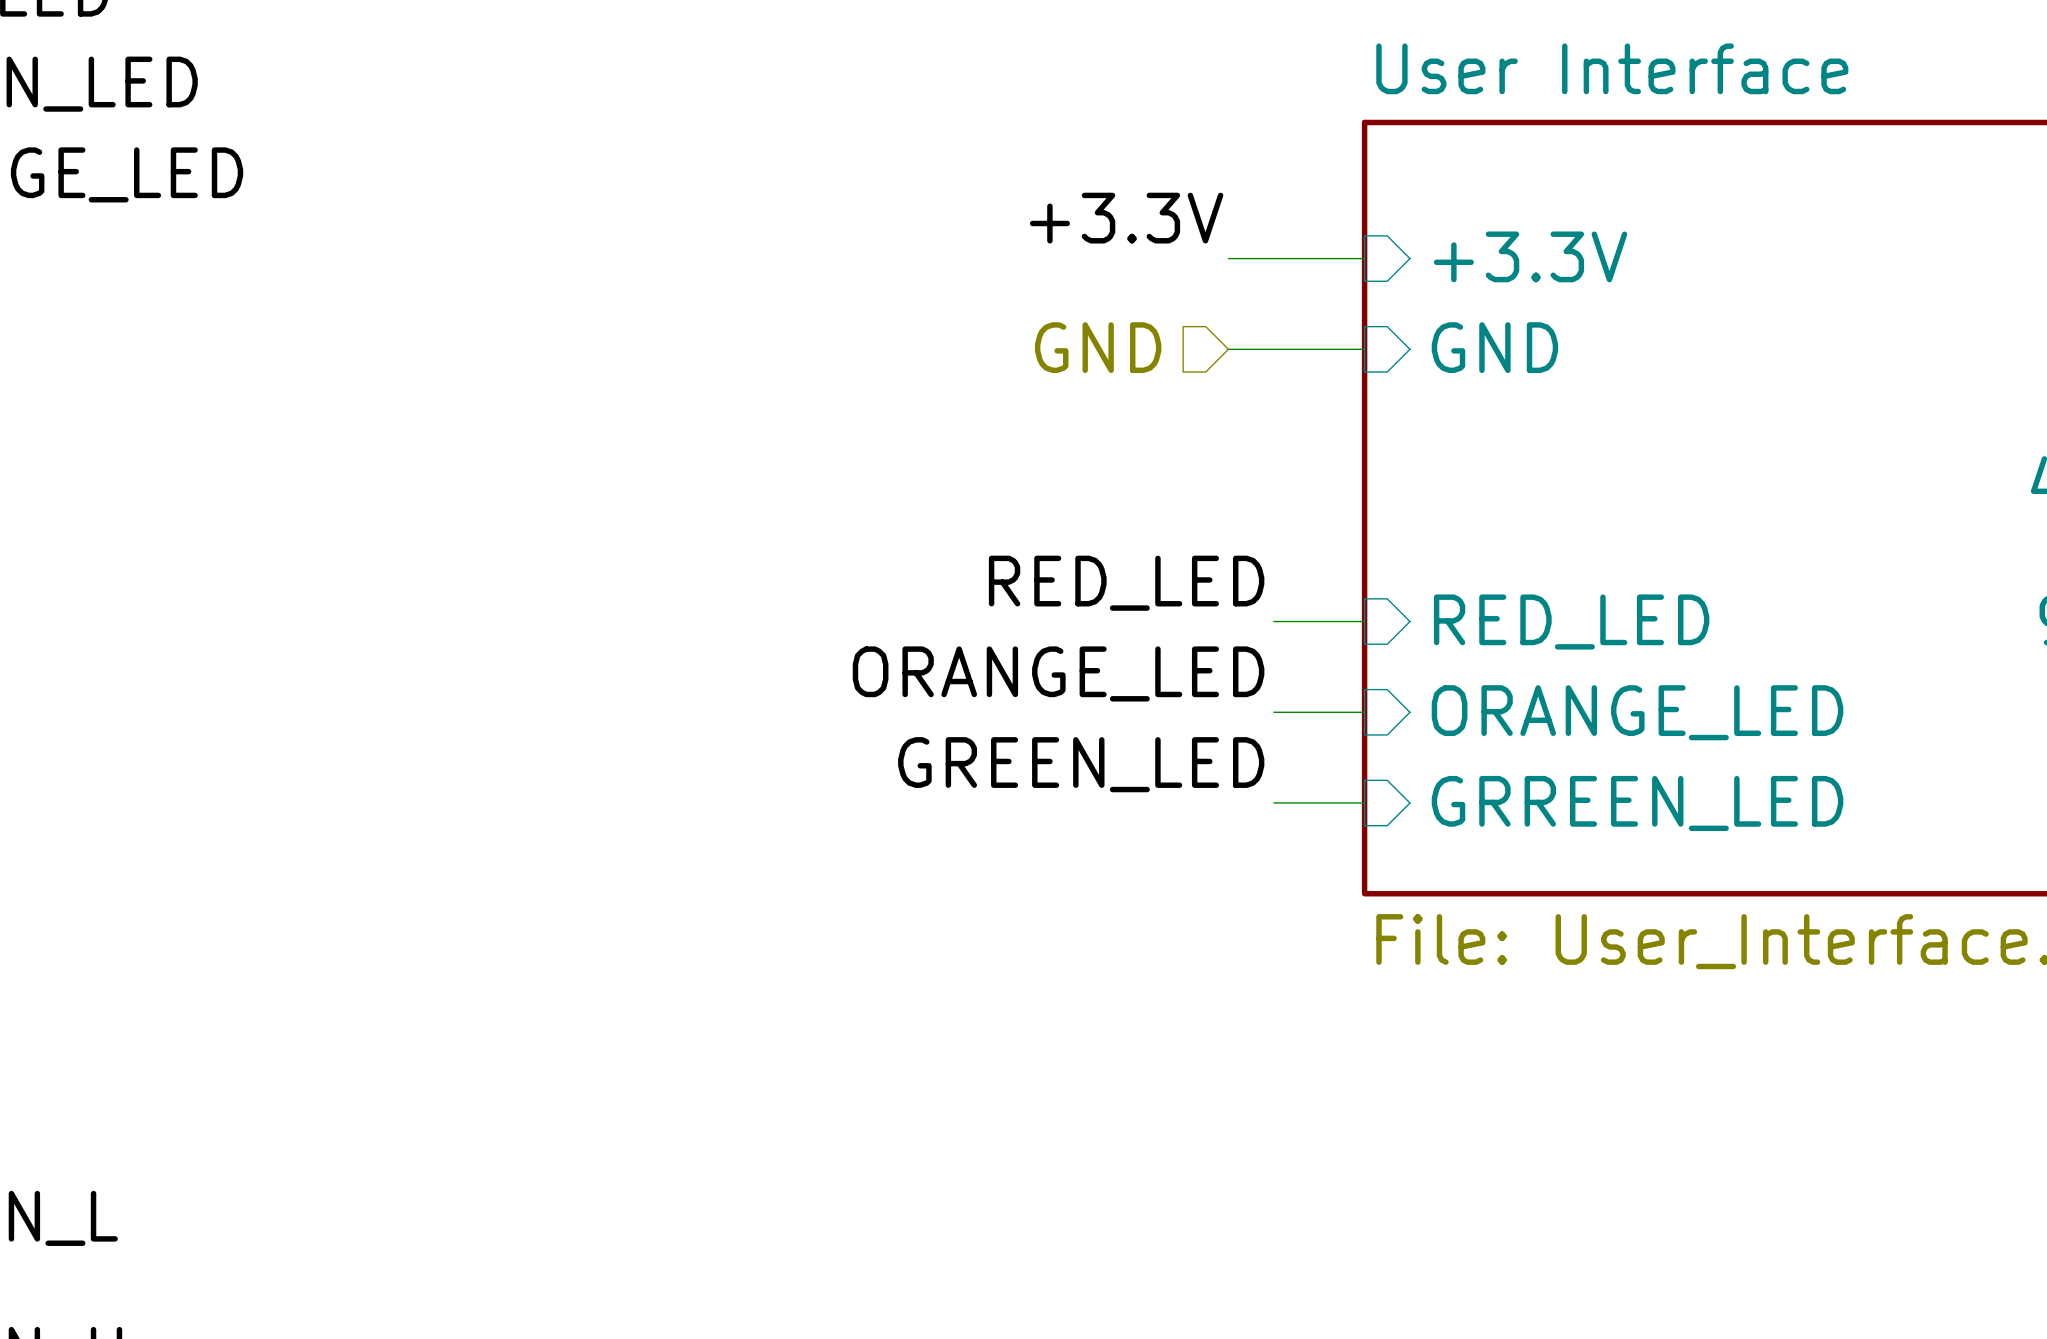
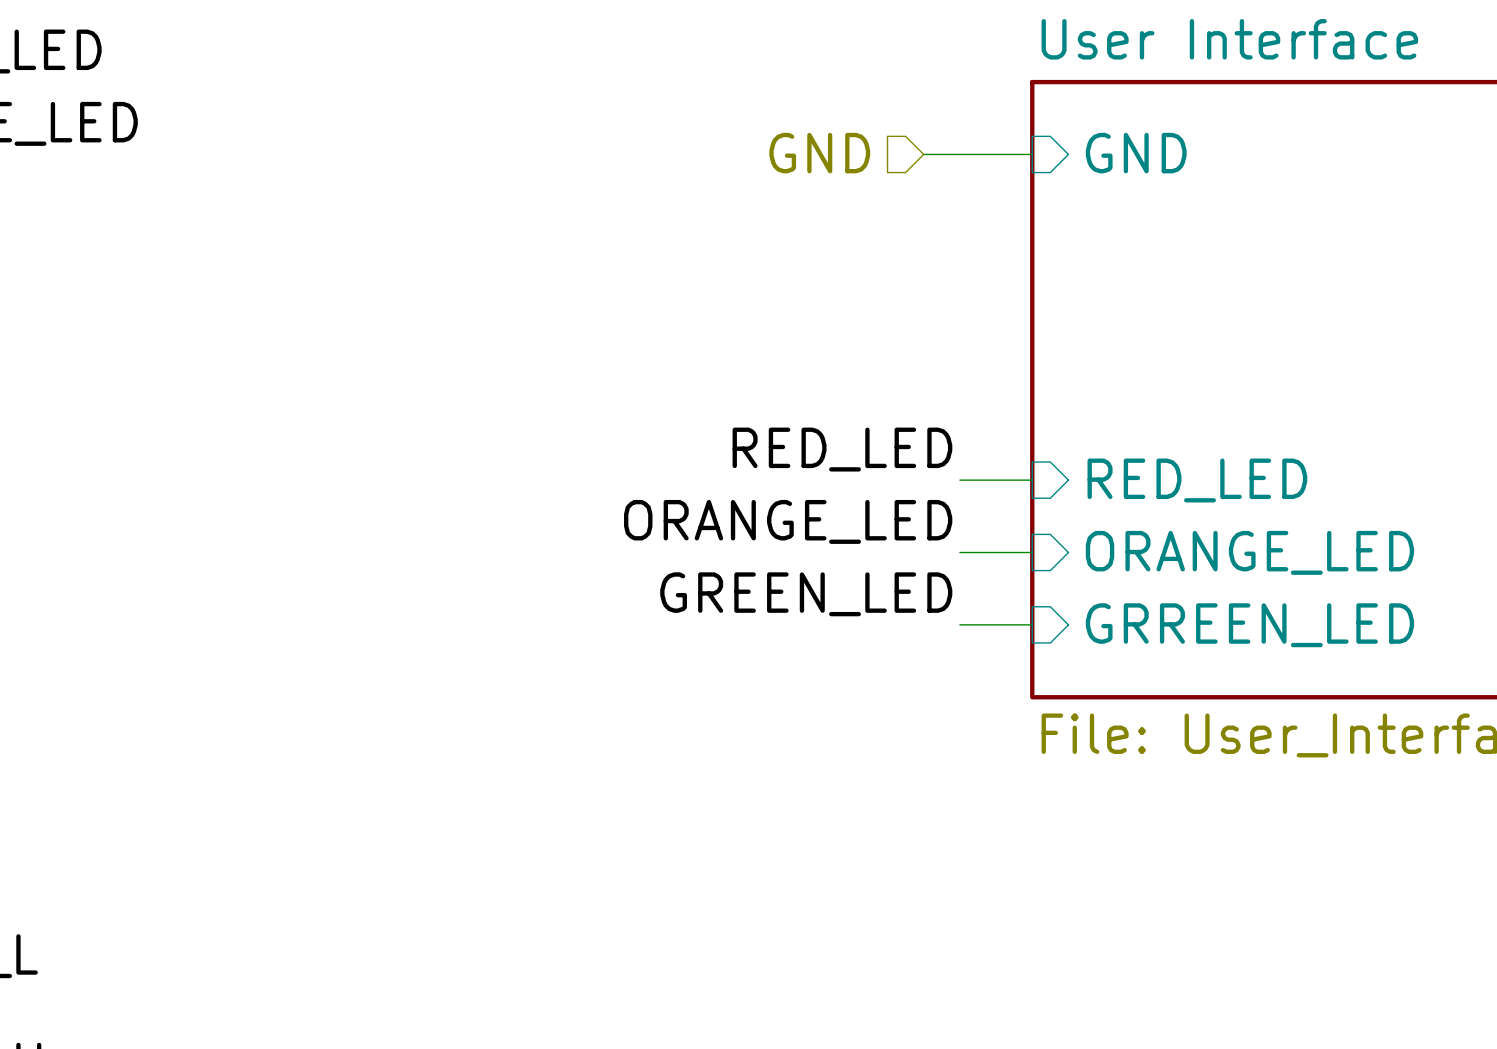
label: +3.3V (1126, 218) -> none
sheet pin: +3.3V (1530, 256) -> none
wire: (1228, 258) (1364, 258) -> (923, 154) (1032, 154)
hierarchical label position: GND (1098, 347) -> GND (819, 153)
sheet pin position: GND (1494, 347) -> GND (1136, 153)
wire: (1228, 349) (1364, 349) -> none

